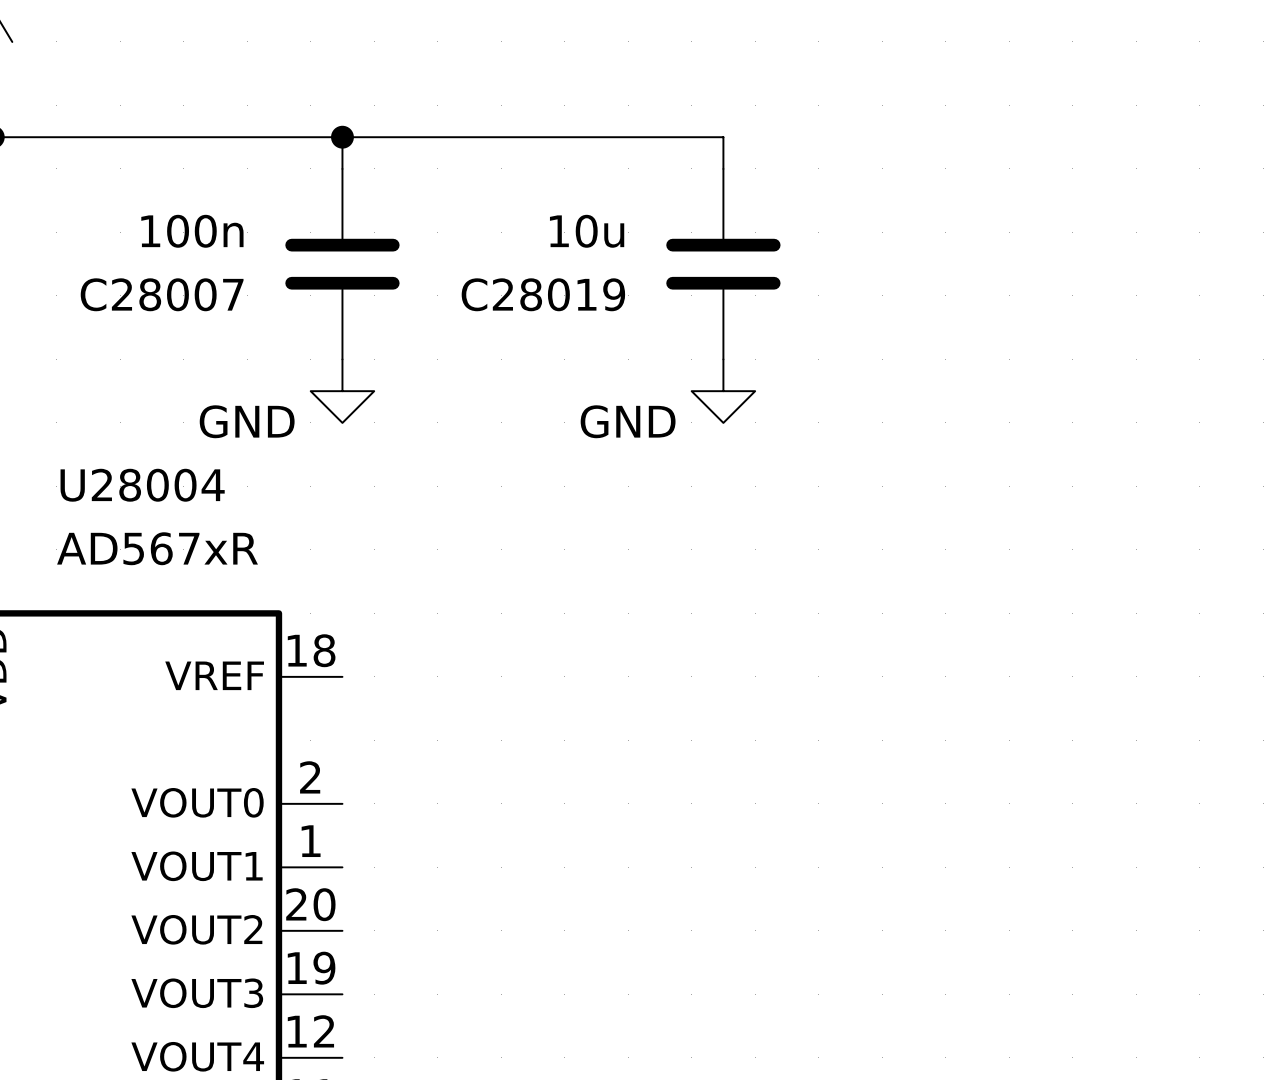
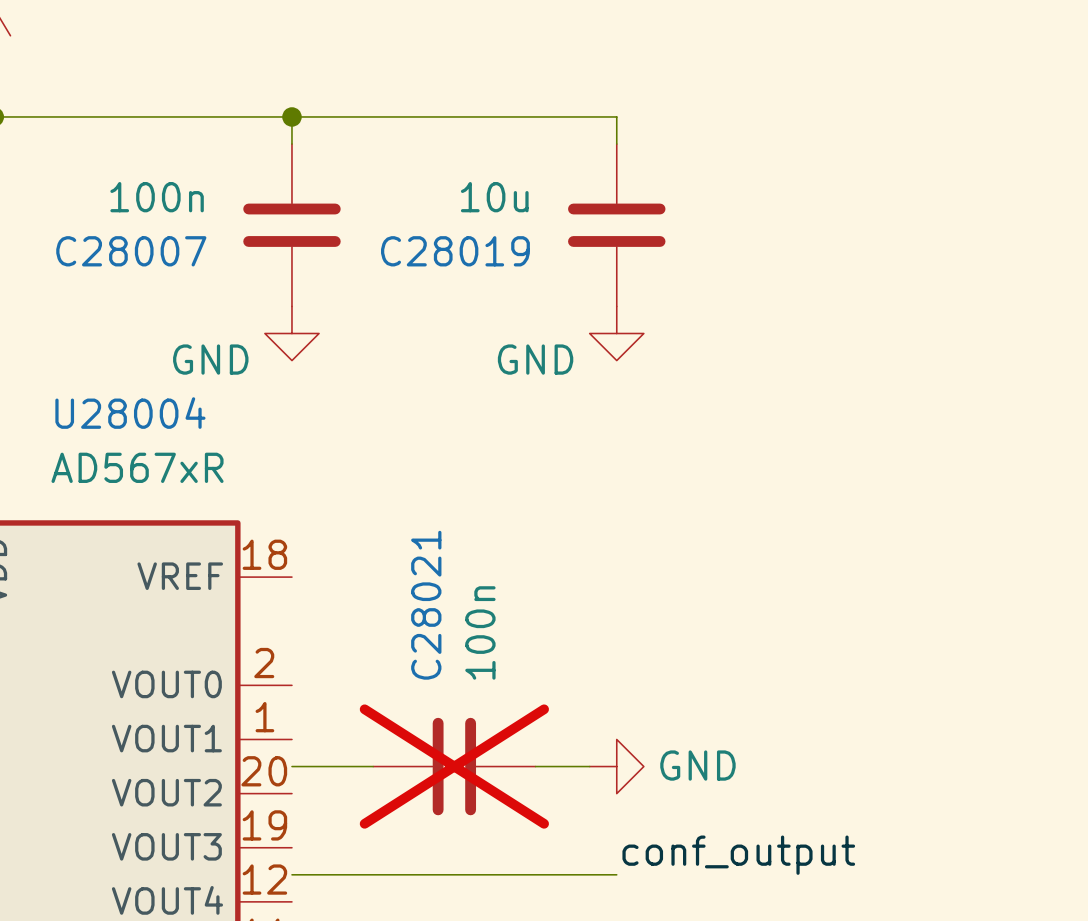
wire: none -> (291, 766) (373, 766)
C28021: none -> 100n (454, 766)
wire: none -> (535, 766) (589, 766)
power symbol: none -> GND (616, 766)
label: none -> conf_output (738, 855)
wire: none -> (291, 874) (616, 874)

